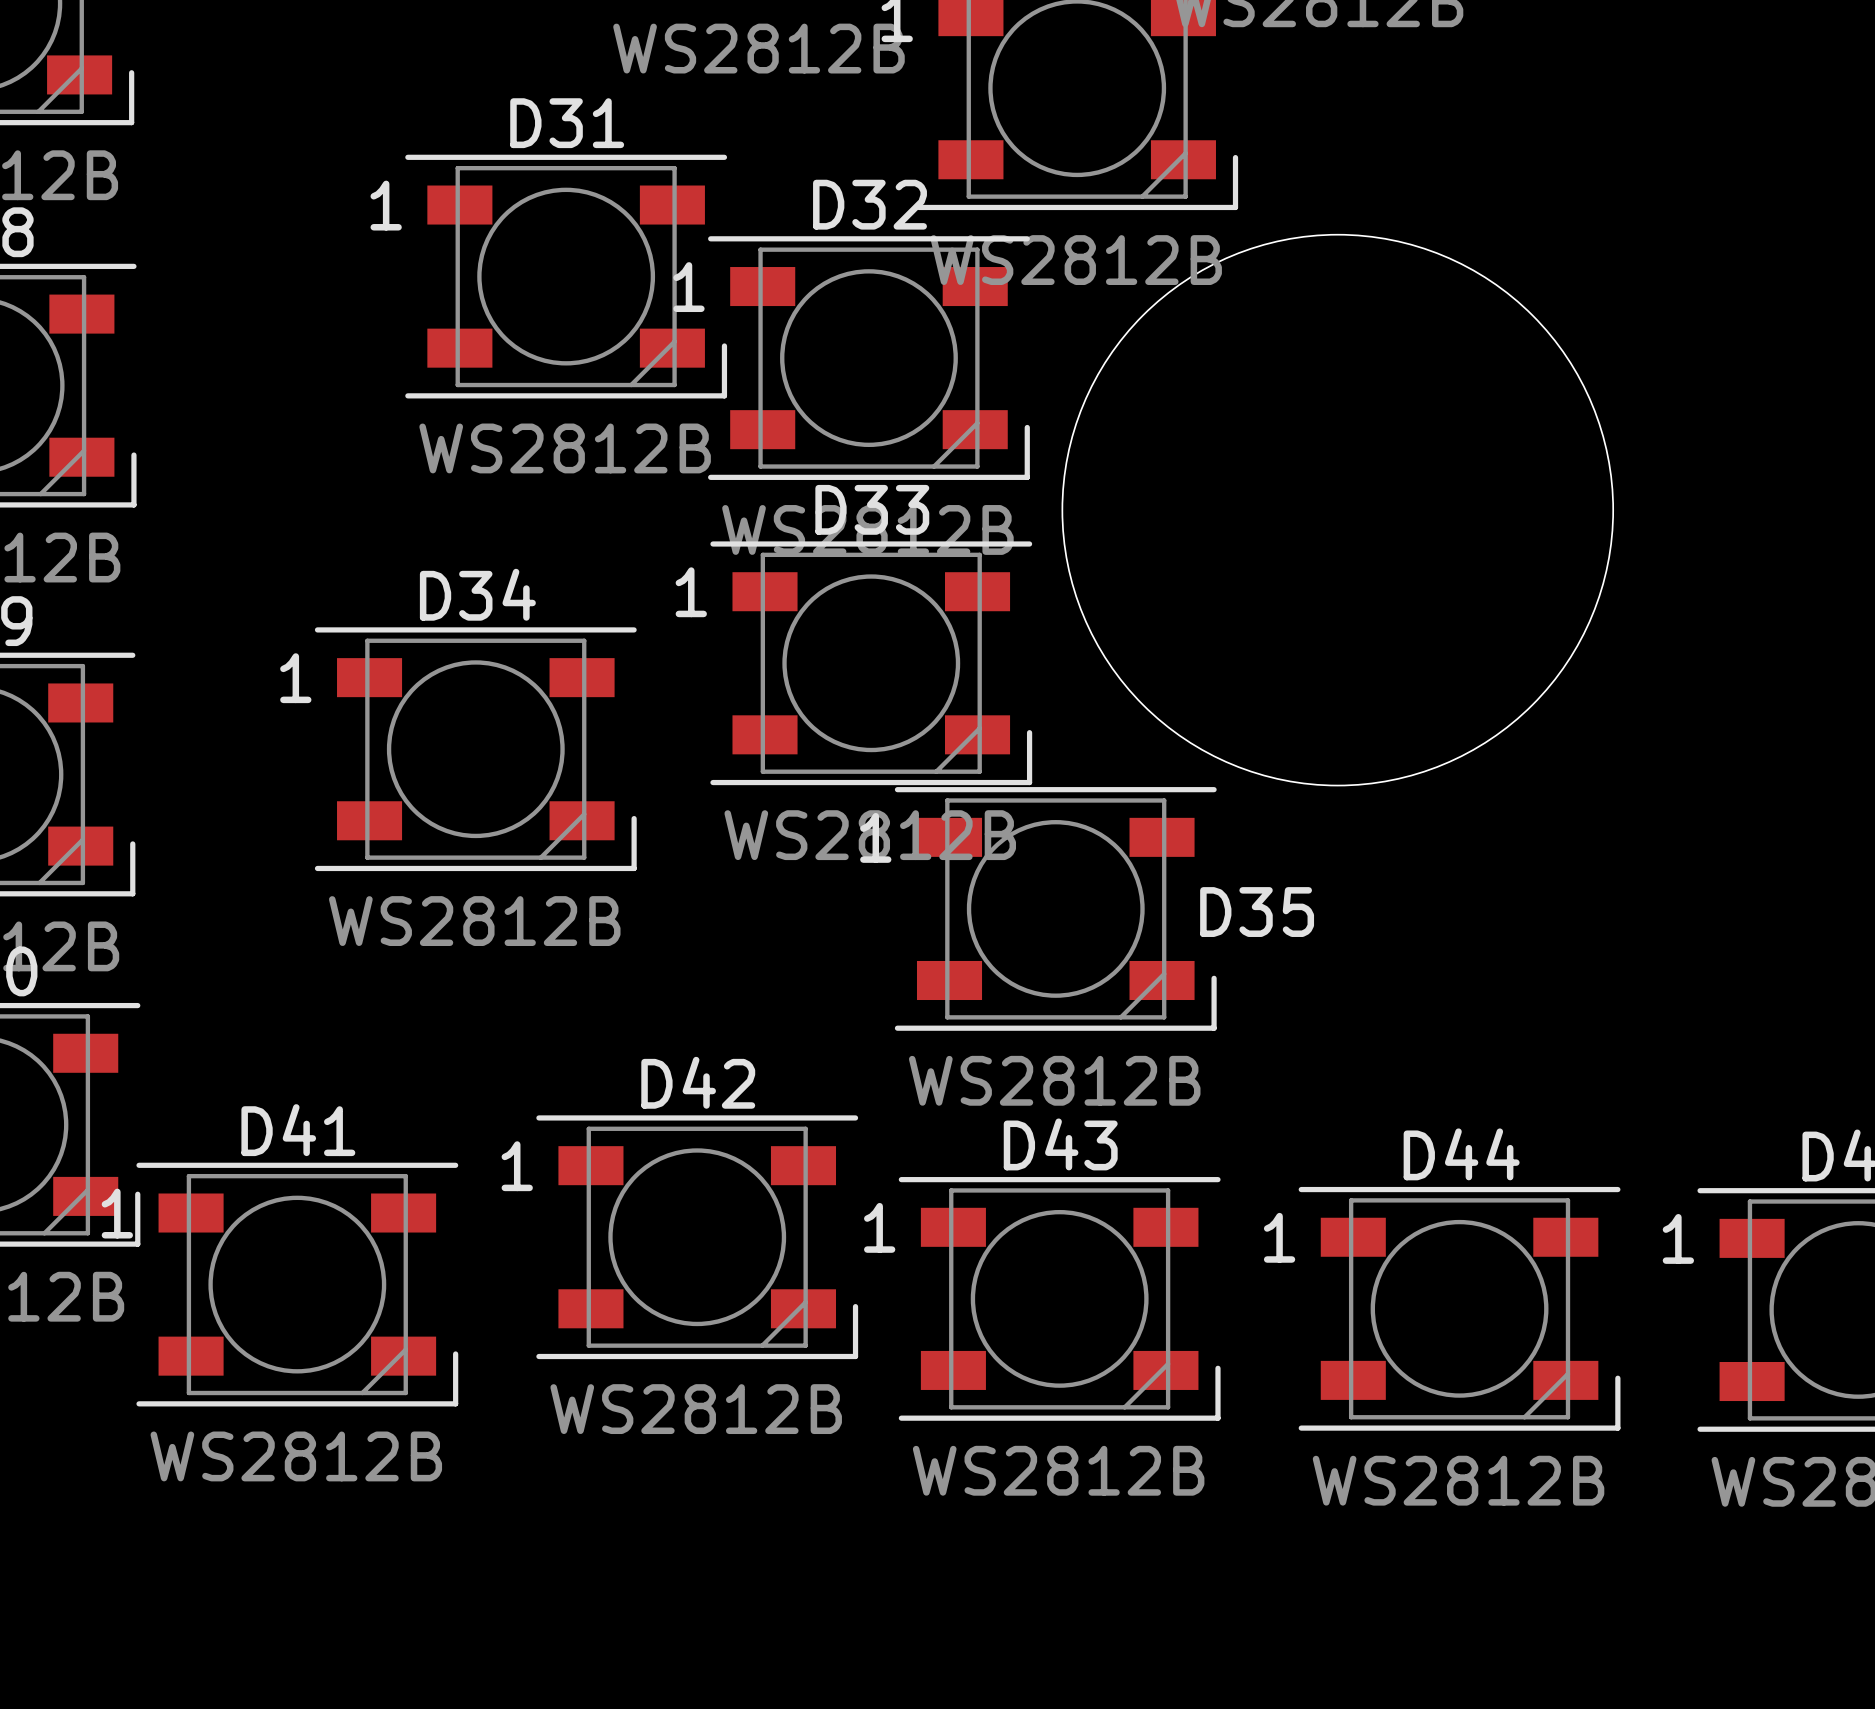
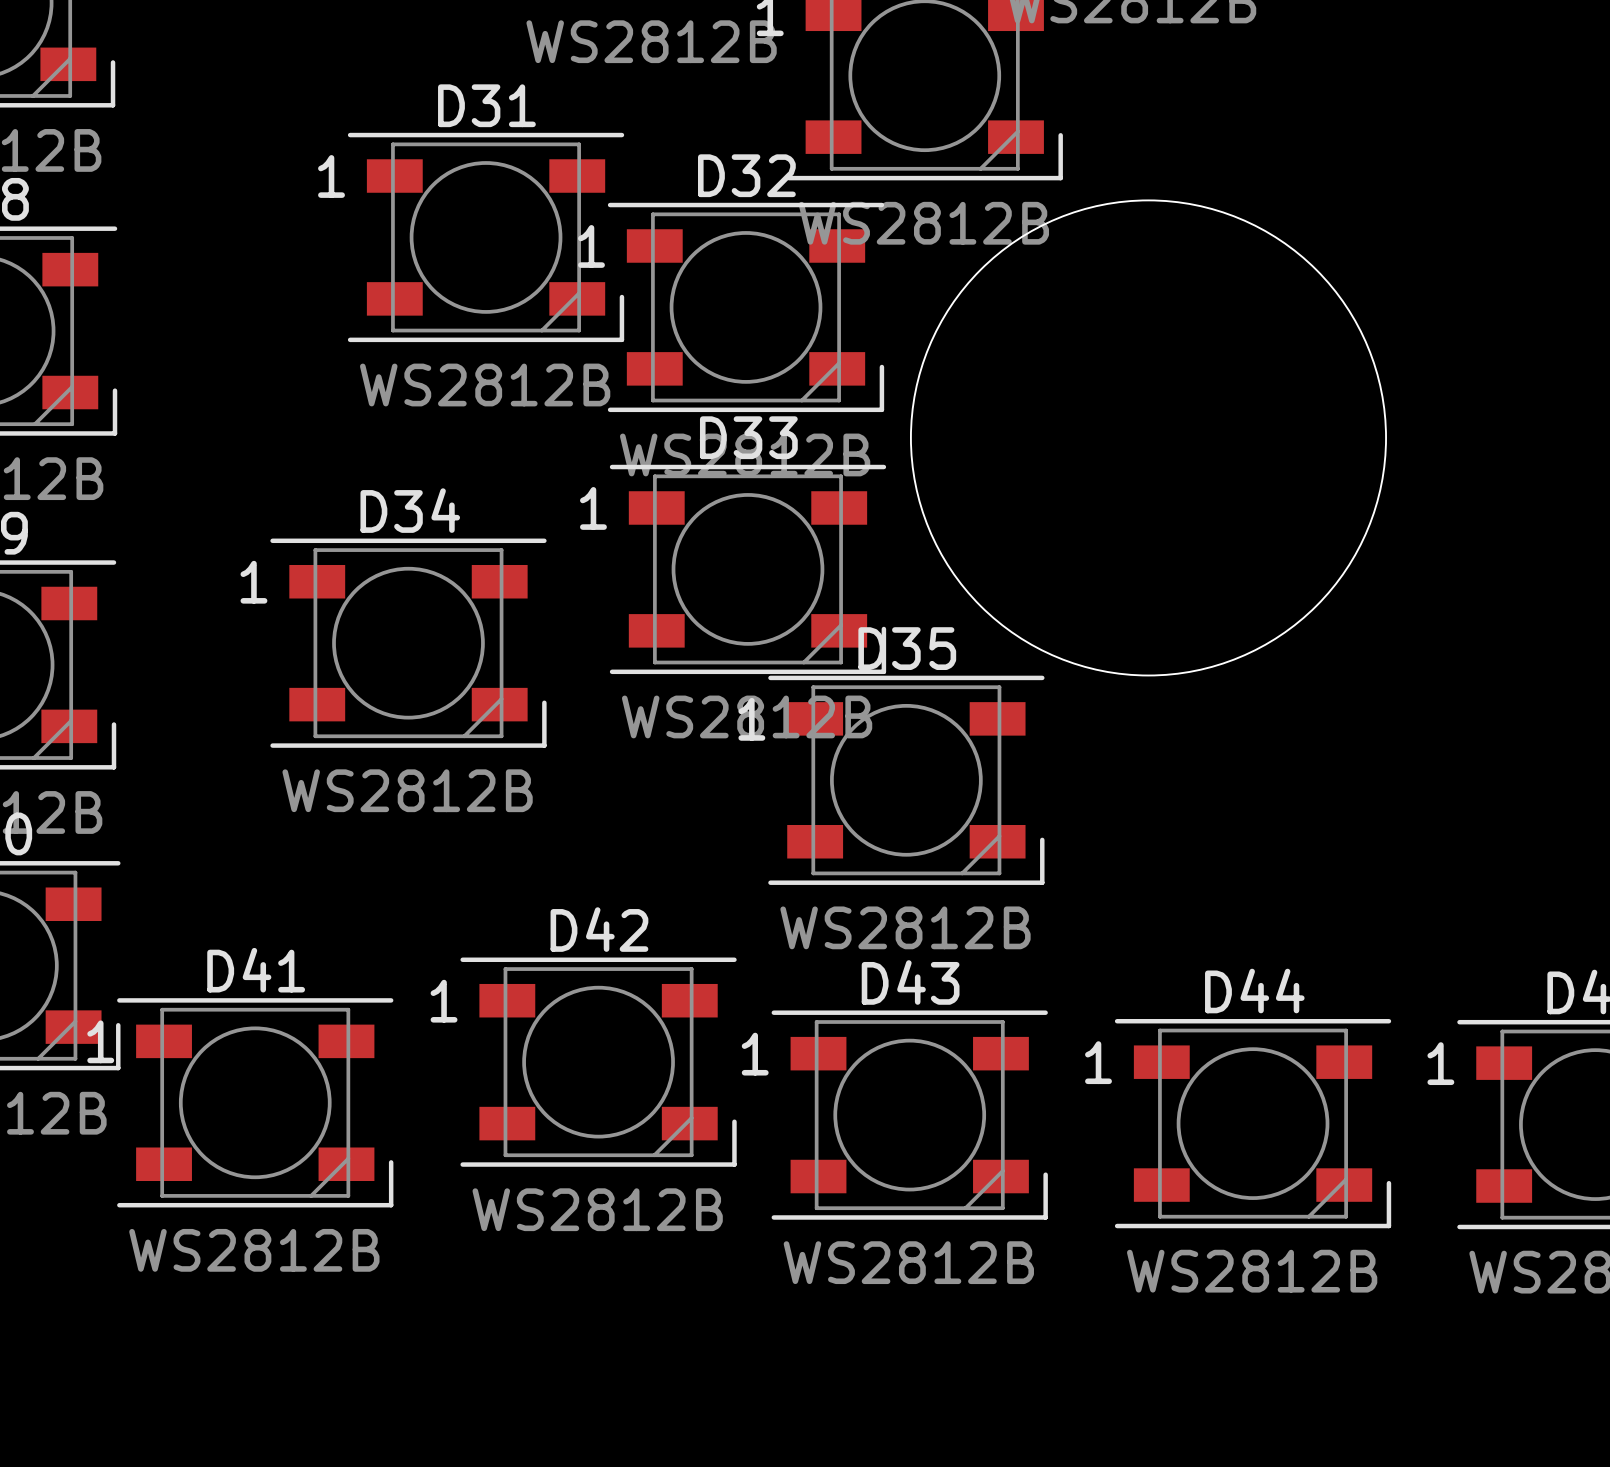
round board edge: none -> [910, 199, 1387, 677]
D35 name position: D35 (1257, 912) -> D35 (907, 648)

